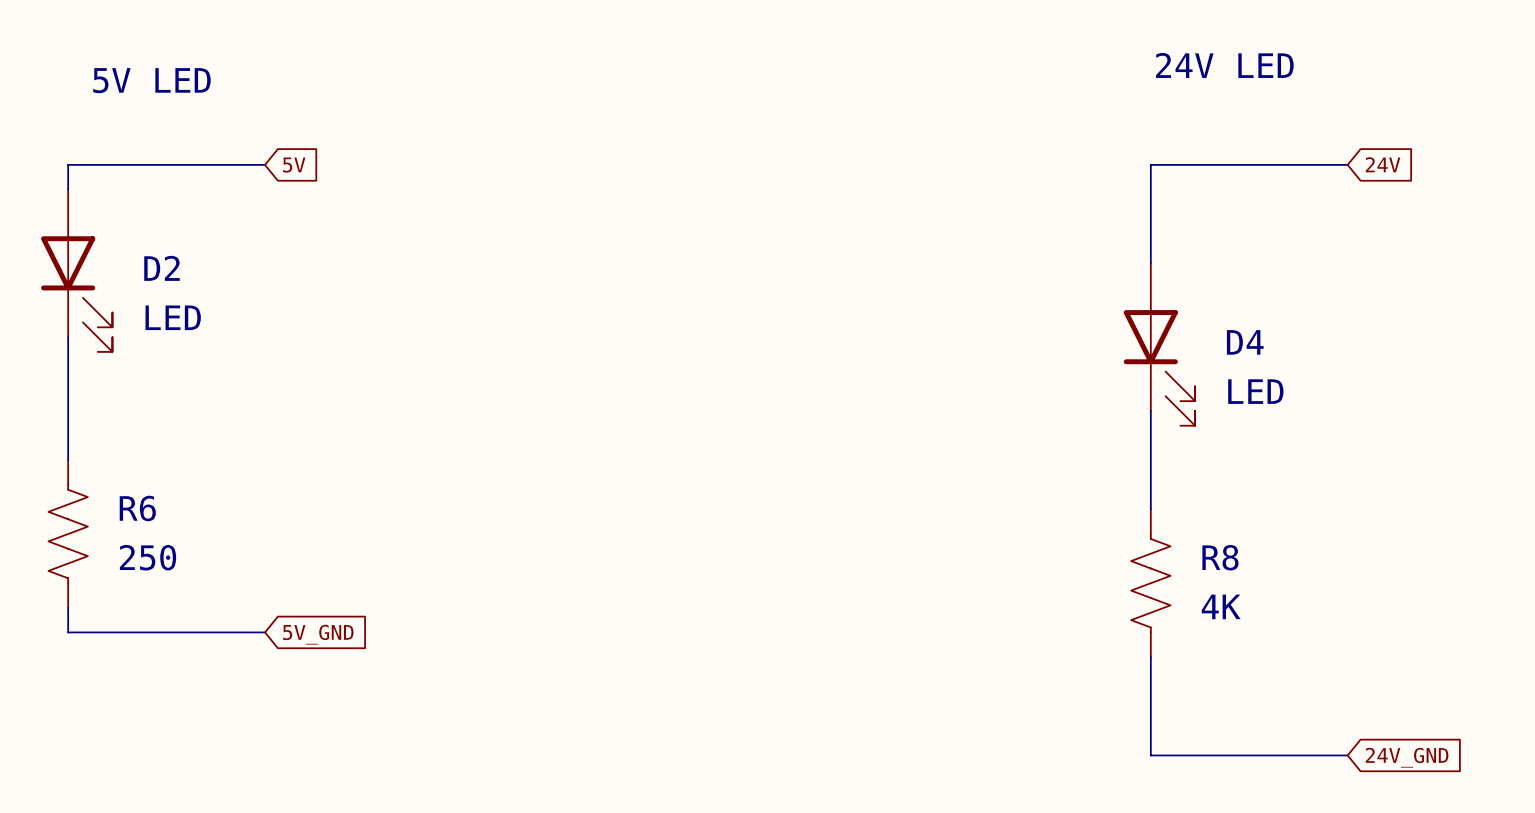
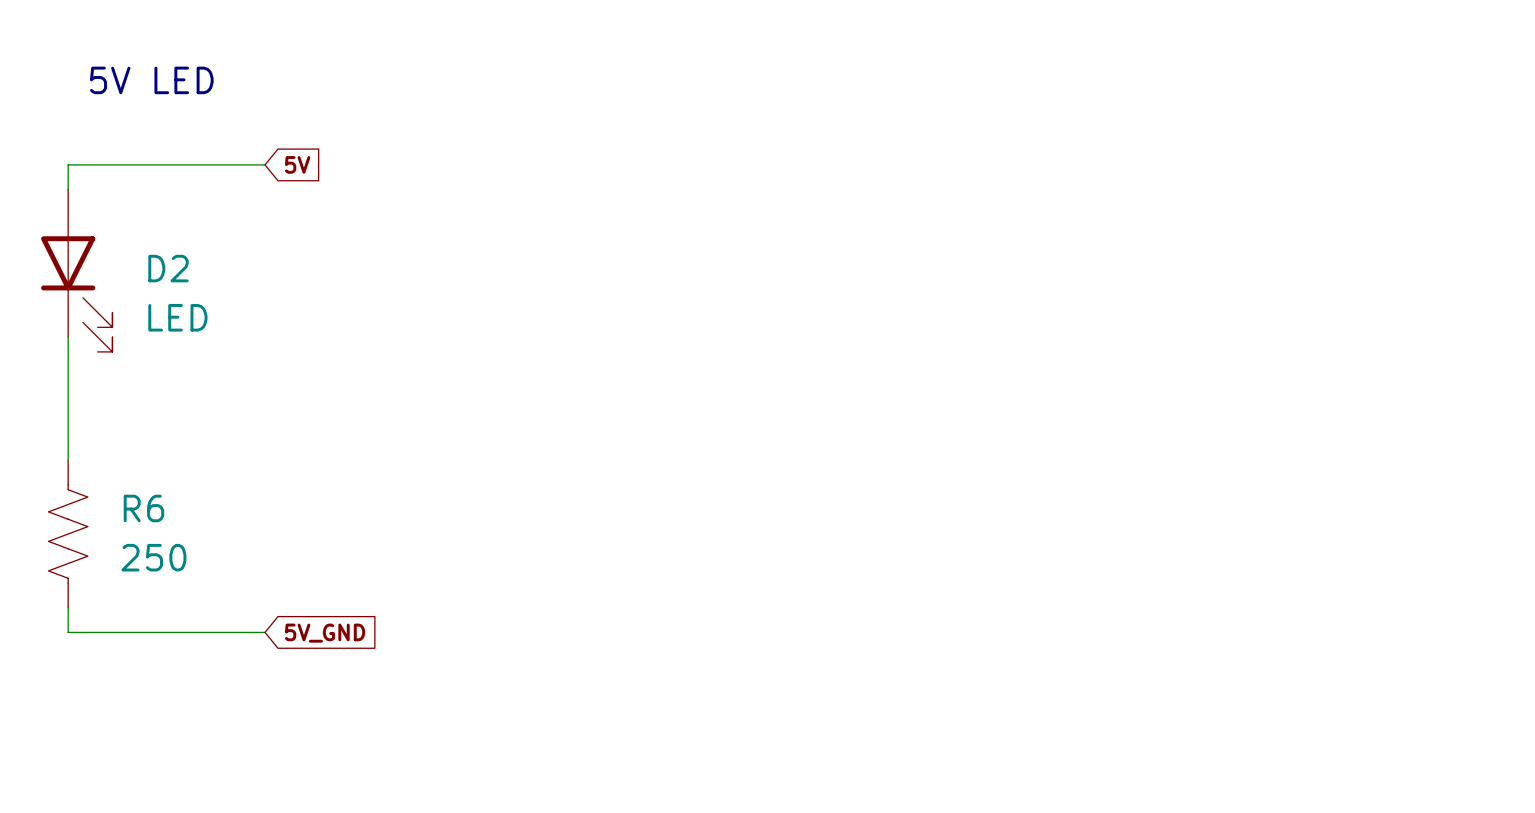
text: 24V LED (1224, 65) -> none
wire: (1347, 164) (1150, 164) (1150, 263) -> none
global label: 24V (1383, 164) -> none
D4: LED (1159, 344) -> none
wire: (1150, 410) (1150, 509) -> none
R8: 4K (1150, 583) -> none
wire: (1150, 657) (1150, 755) (1347, 755) -> none
global label: 24V_GND (1407, 757) -> none

